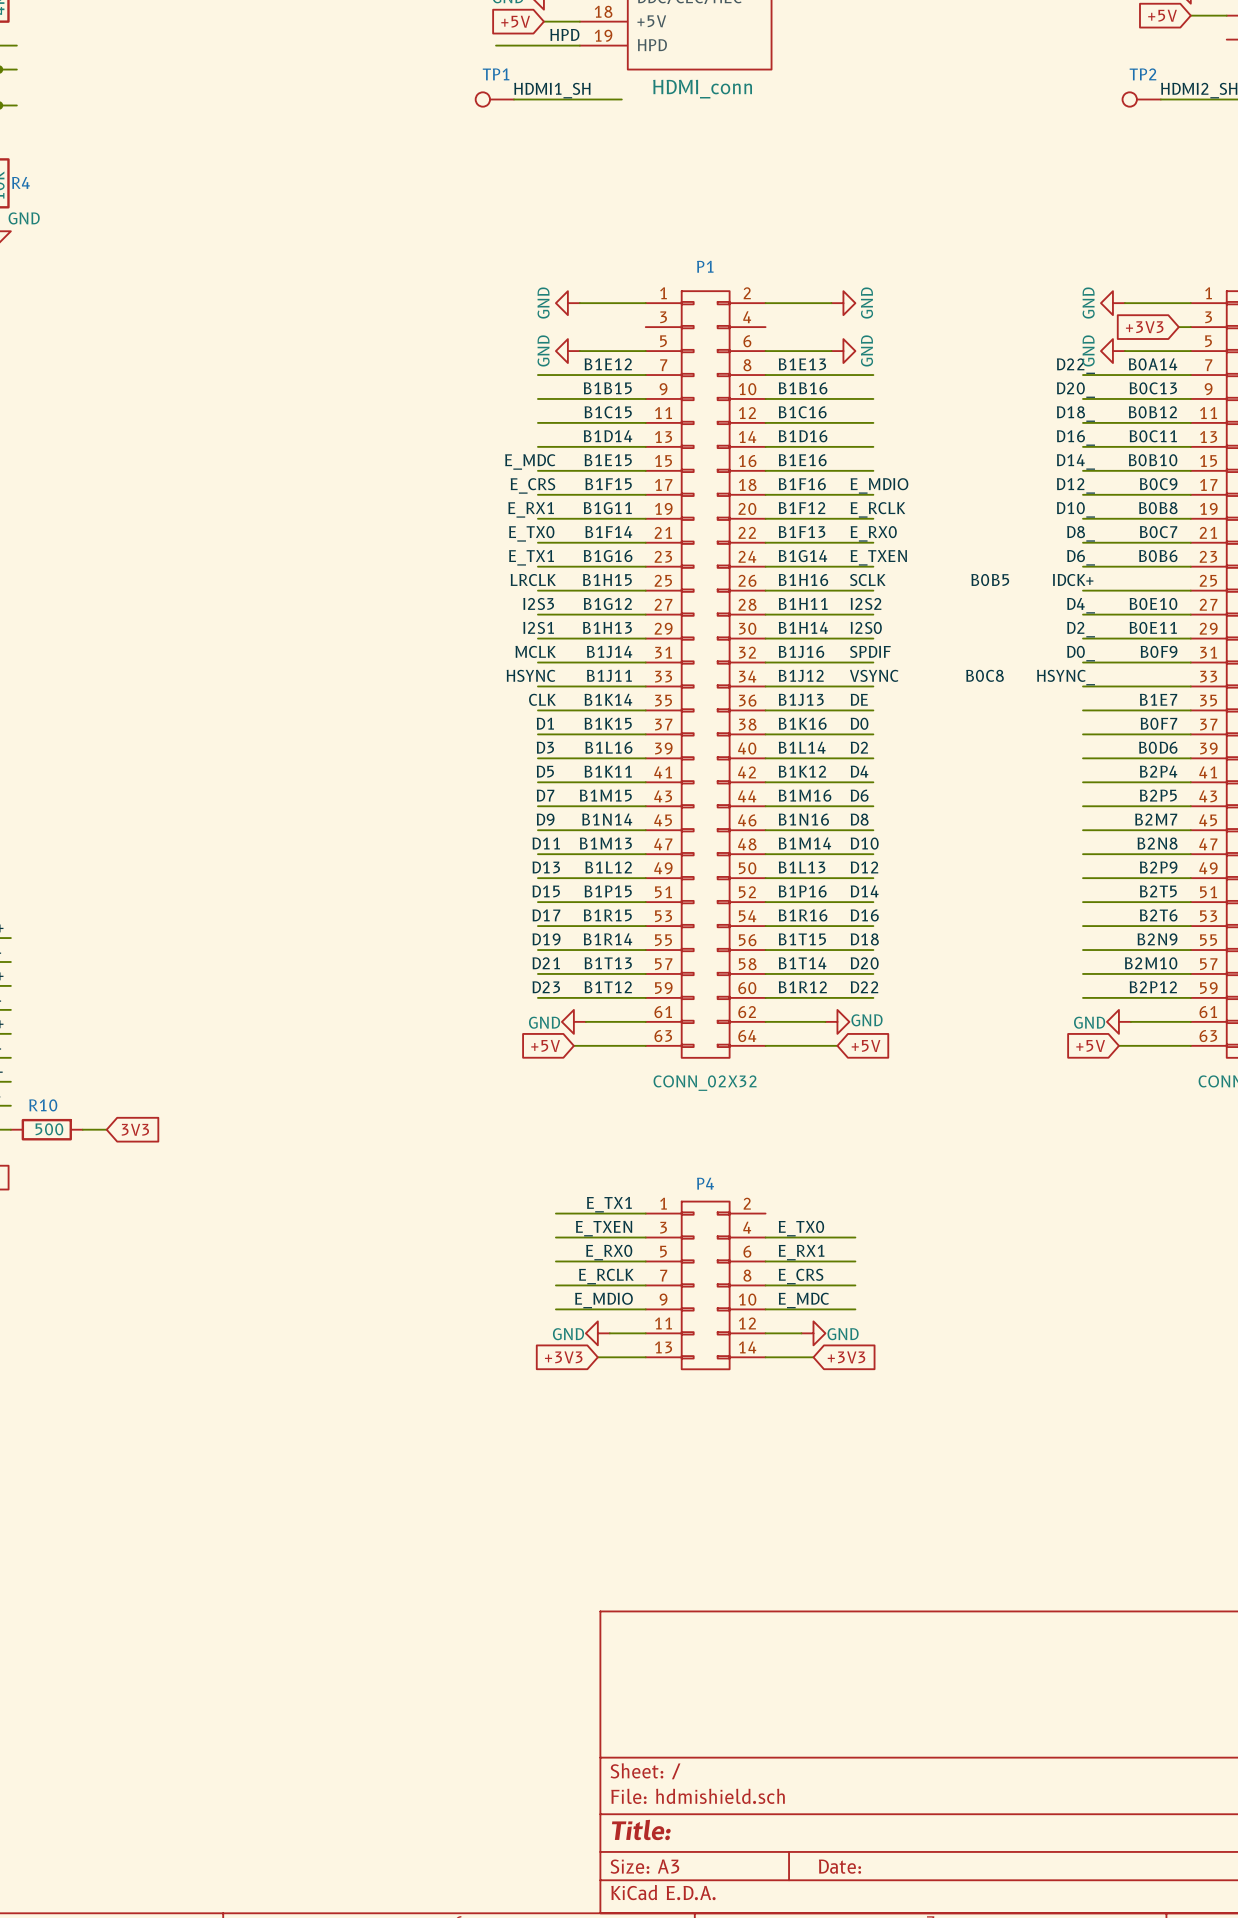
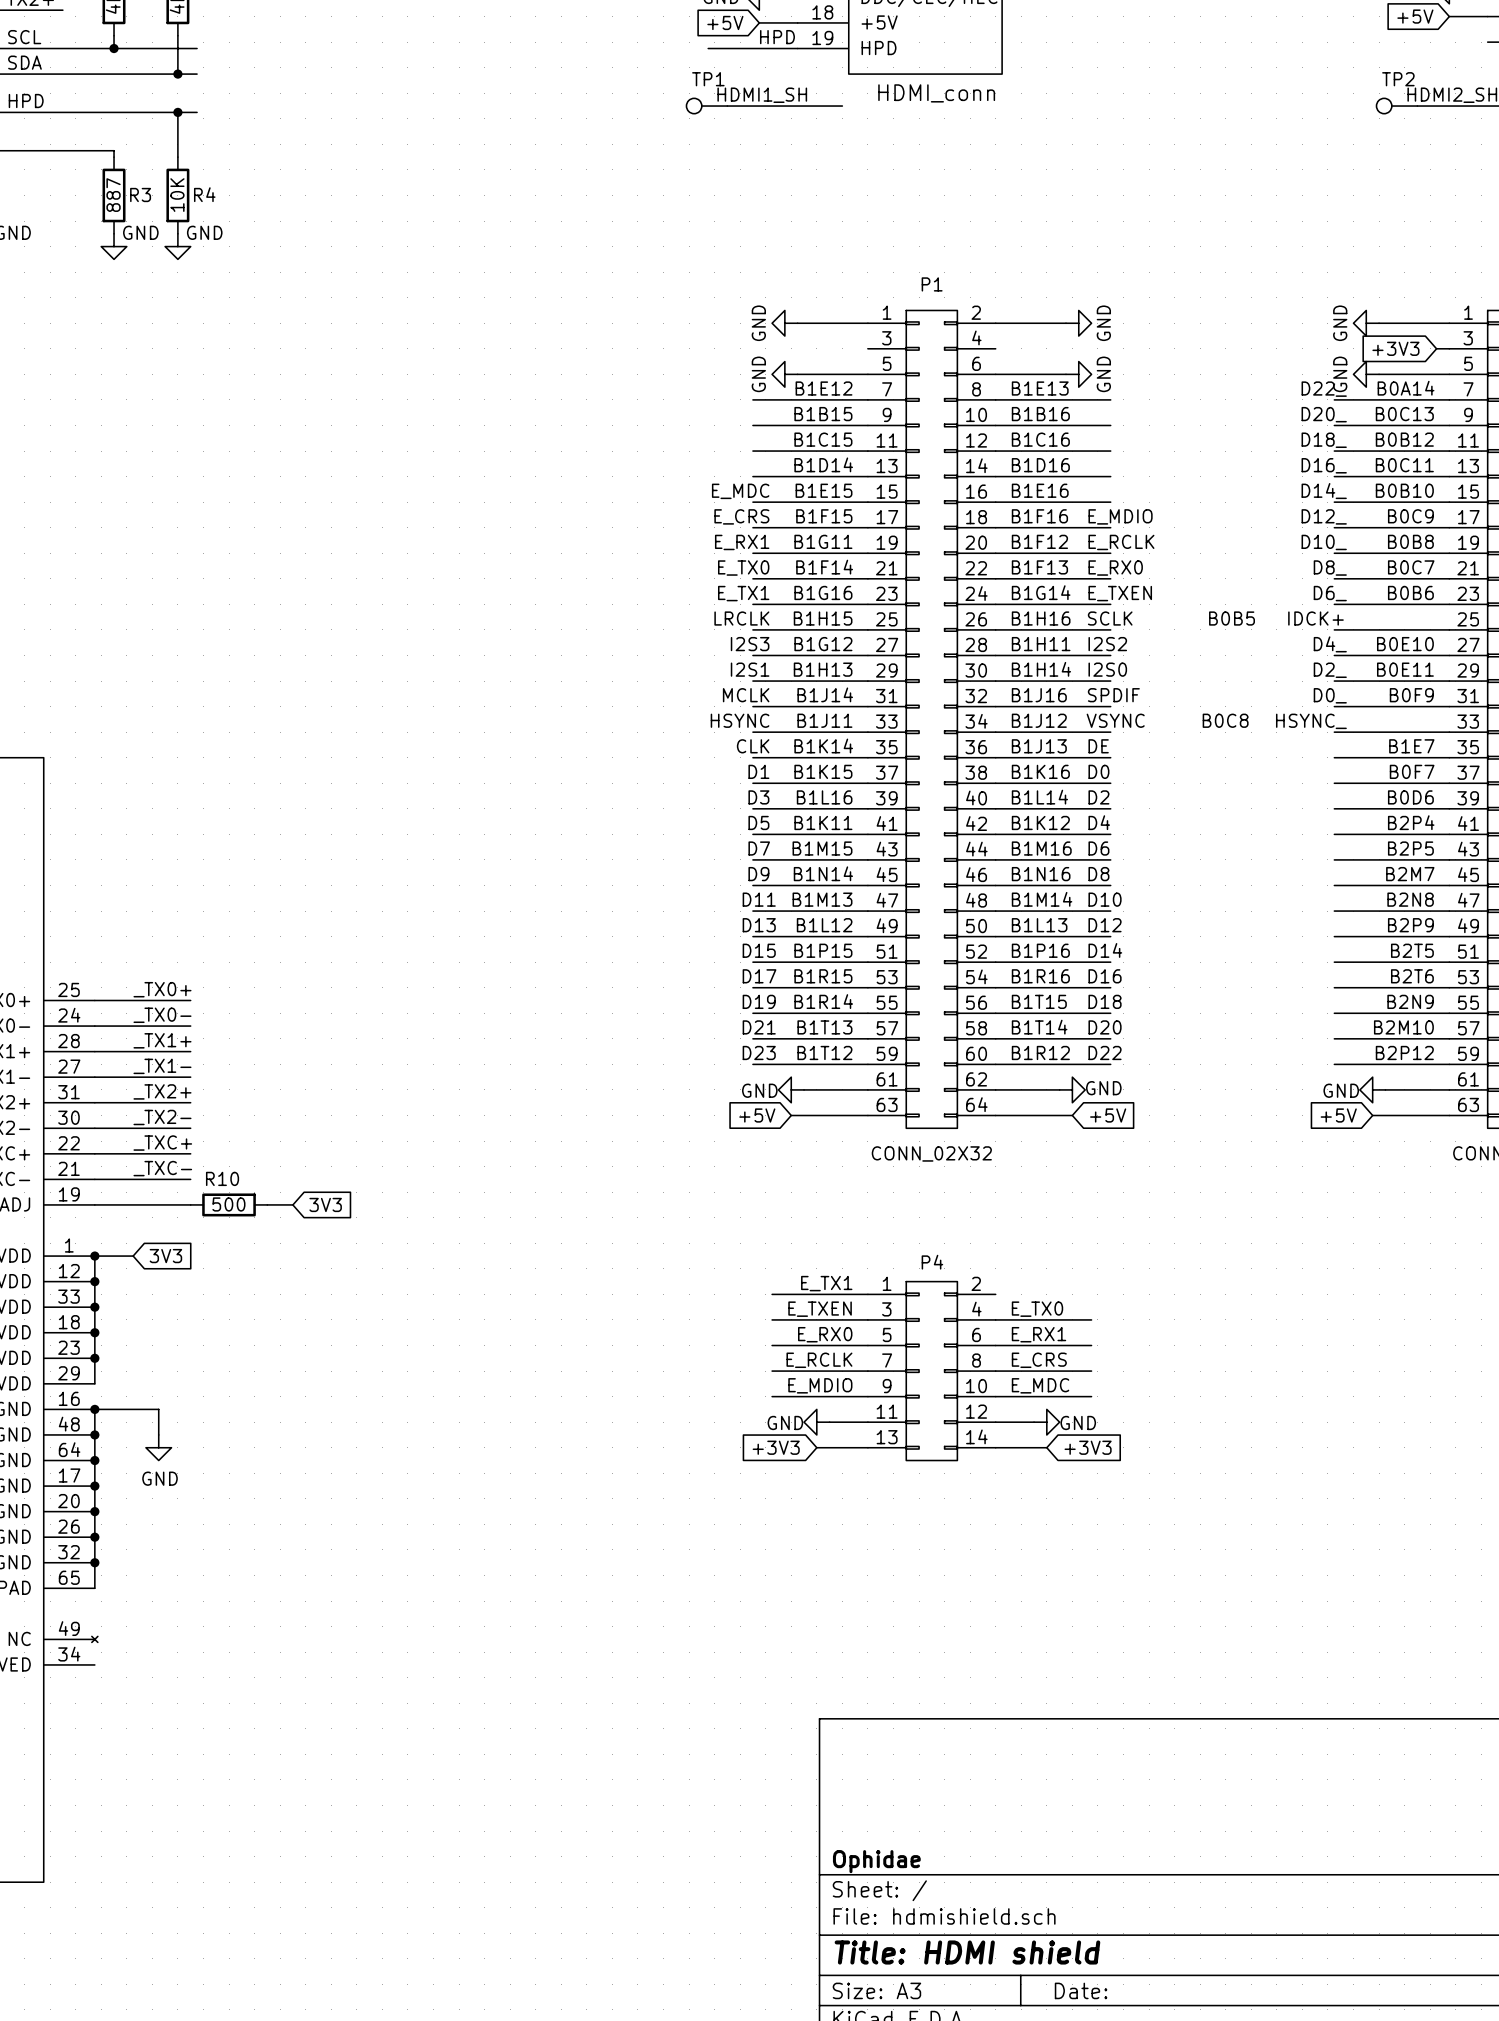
title block: none -> Ophidae (876, 1861)
title block: Title: (641, 1829) -> Title: HDMI shield (967, 1952)

